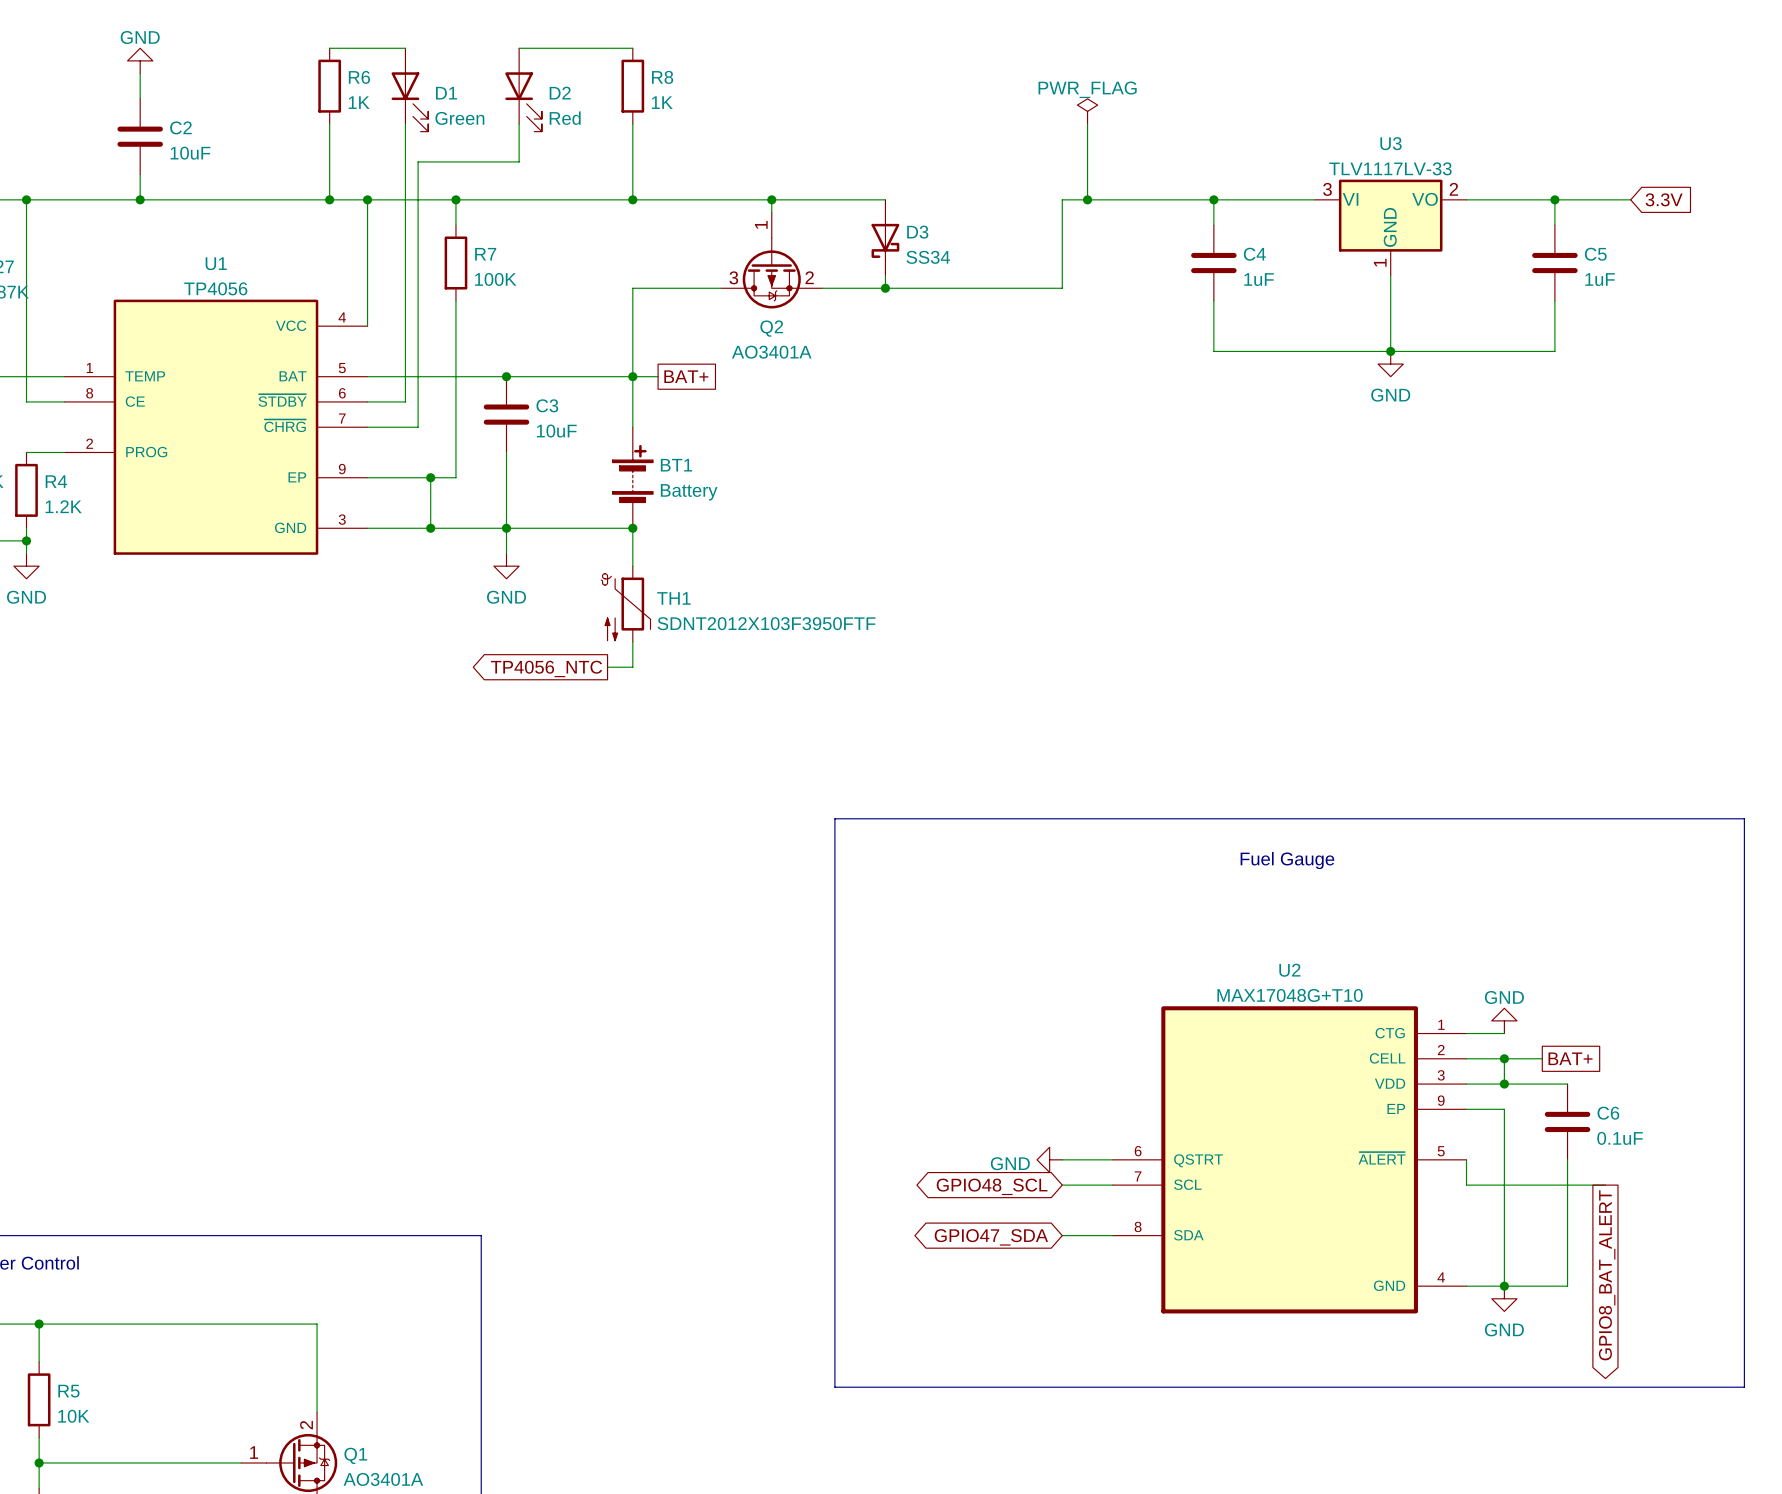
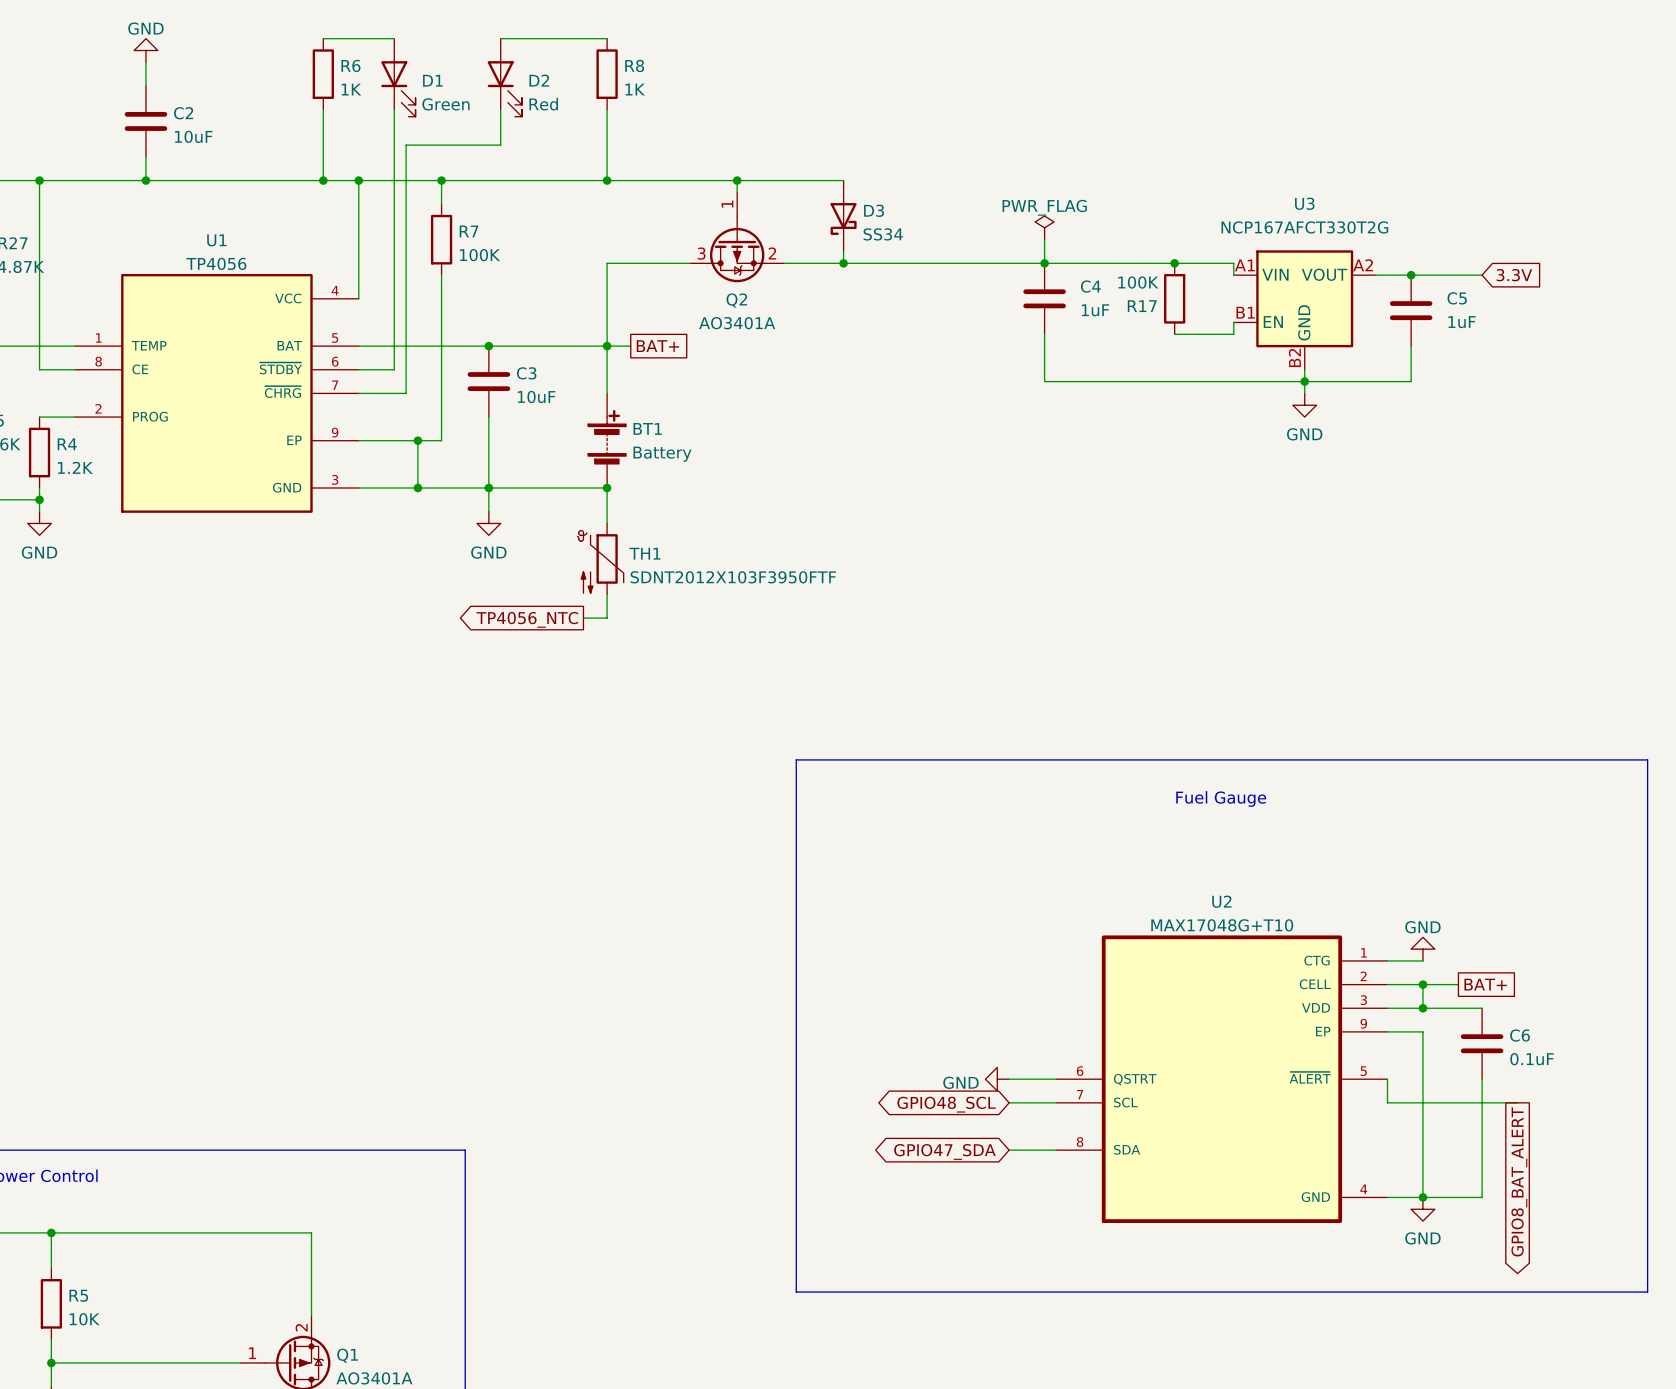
power symbol position: PWR_FLAG (1087, 111) -> PWR_FLAG (1044, 227)
wire: (1087, 124) (1087, 199) -> none
U3 name position: U3 (1391, 143) -> U3 (1304, 203)
U3 value: TLV1117LV-33 (1390, 168) -> NCP167AFCT330T2G (1304, 227)
U3 symbol: [1314, 179, 1467, 276] -> [1233, 250, 1376, 370]
junction: (1087, 199) -> none
wire: (1213, 199) (1213, 225) -> (1044, 239) (1044, 263)
junction: (1213, 199) -> none
wire: (1314, 199) (1062, 199) (1062, 288) -> (1233, 275) (1233, 263) (1009, 263)
wire: (1466, 199) (1630, 199) -> none
wire: (1554, 199) (1554, 225) -> none
junction: (1554, 199) -> none
global label position: 3.3V (1664, 199) -> 3.3V (1514, 275)
C4 name position: C4 (1254, 254) -> C4 (1090, 286)
C5 name position: C5 (1595, 254) -> C5 (1457, 298)
C4 position: (1213, 263) -> (1044, 298)
C5 position: (1554, 263) -> (1411, 310)
C4 value position: 1uF (1259, 279) -> 1uF (1095, 310)
C5 value position: 1uF (1600, 279) -> 1uF (1461, 322)
junction: none -> (1044, 263)
junction: none -> (1174, 263)
wire: (1213, 300) (1213, 351) (1554, 351) (1554, 300) -> none
wire: none -> (1375, 275) (1482, 275)
junction: none -> (1411, 275)
R17: none -> 100K (1174, 298)
wire: none -> (1233, 322) (1233, 334) (1174, 334)
junction: (1390, 351) -> none
wire: none -> (1044, 334) (1044, 381) (1411, 381) (1411, 346)
power symbol position: GND (1390, 364) -> GND (1304, 405)
wire: none -> (1304, 369) (1304, 393)
junction: none -> (1304, 381)

